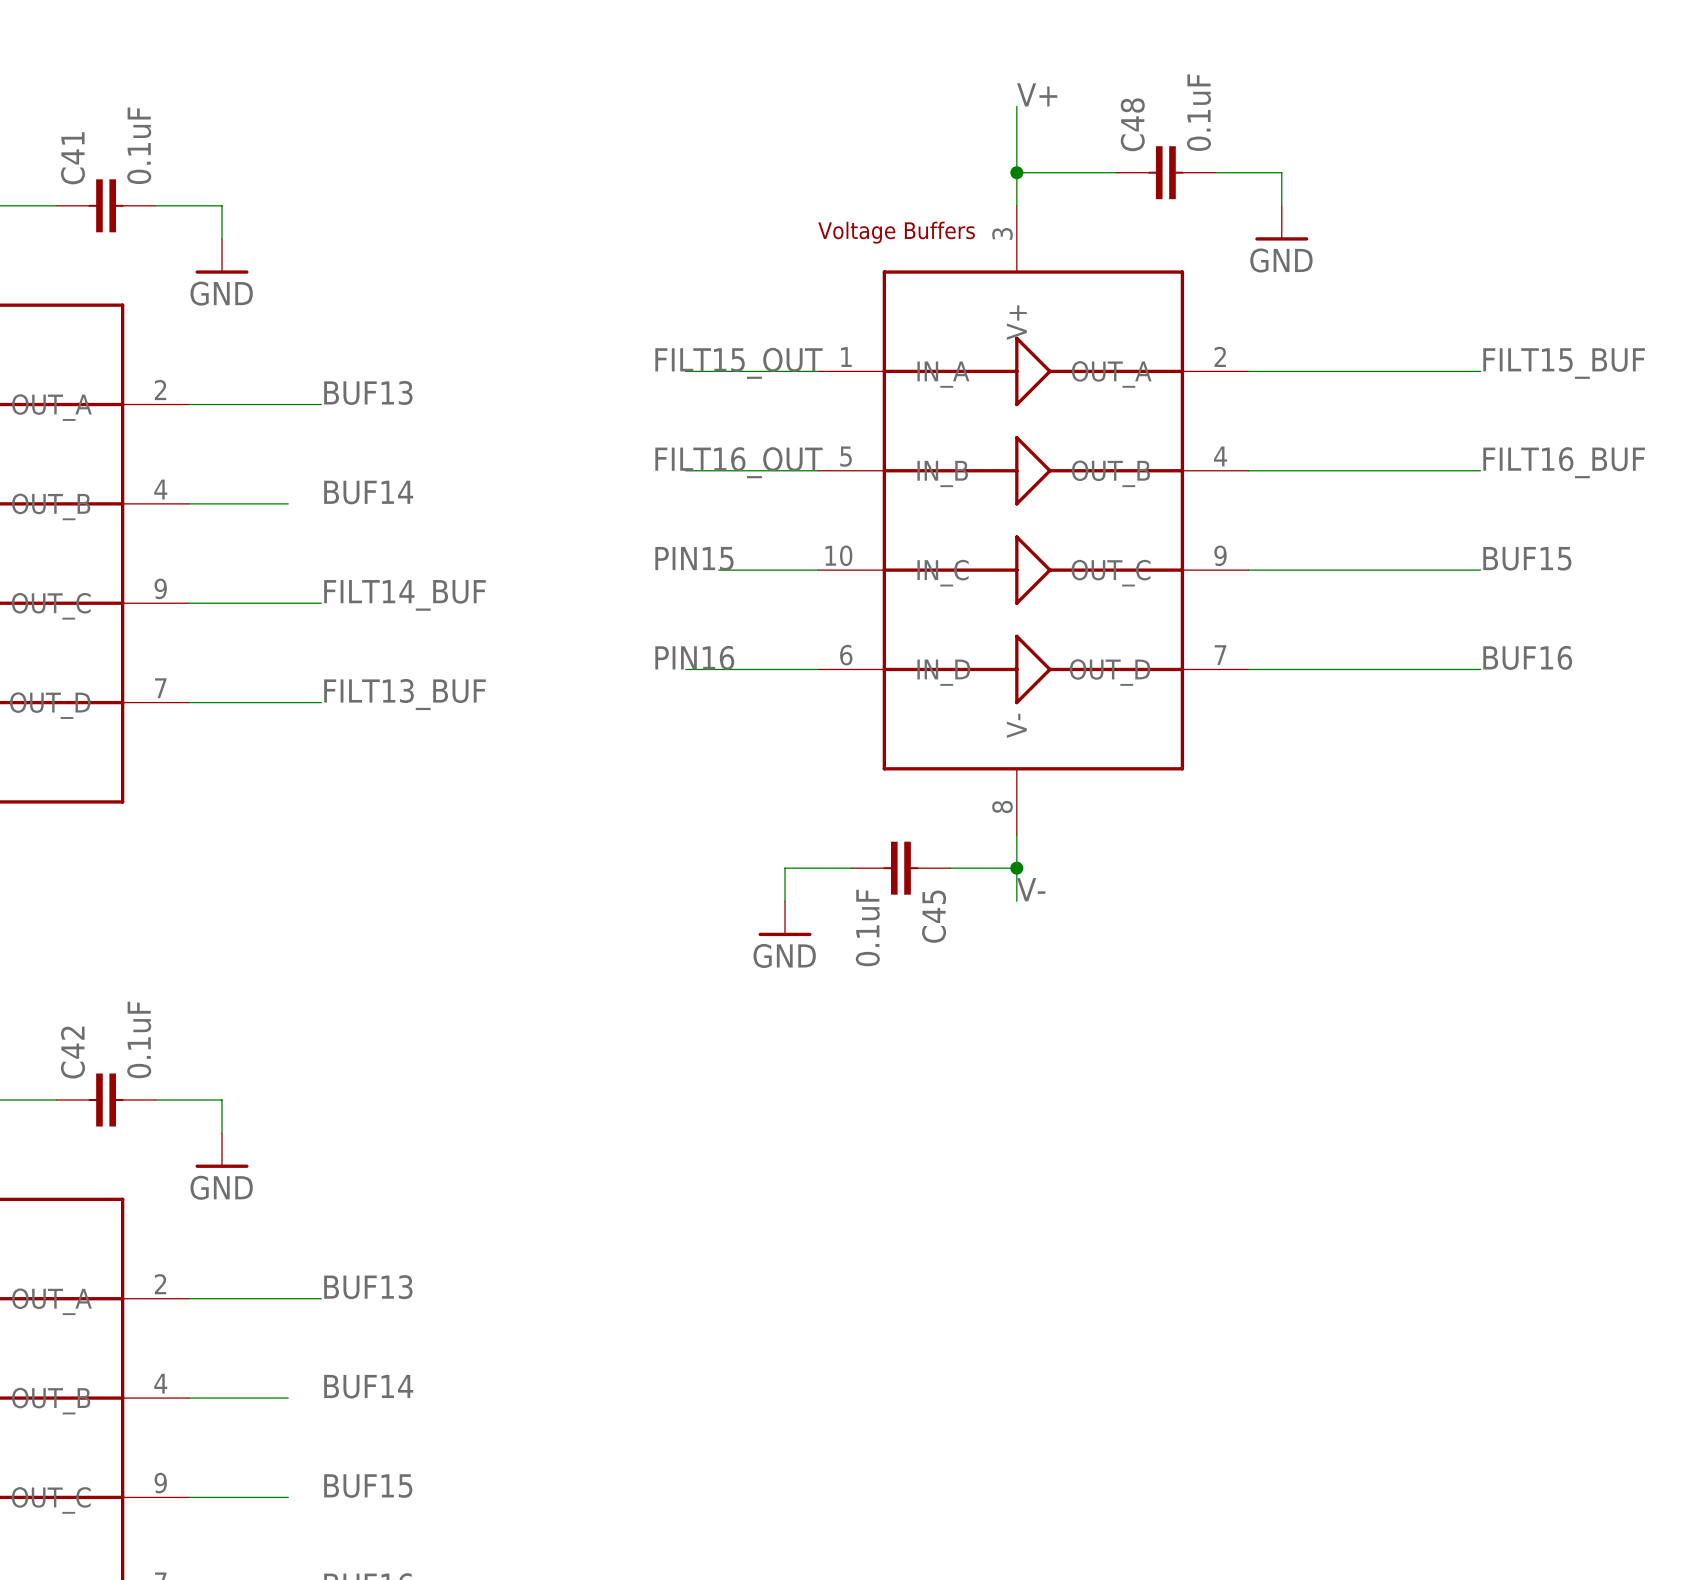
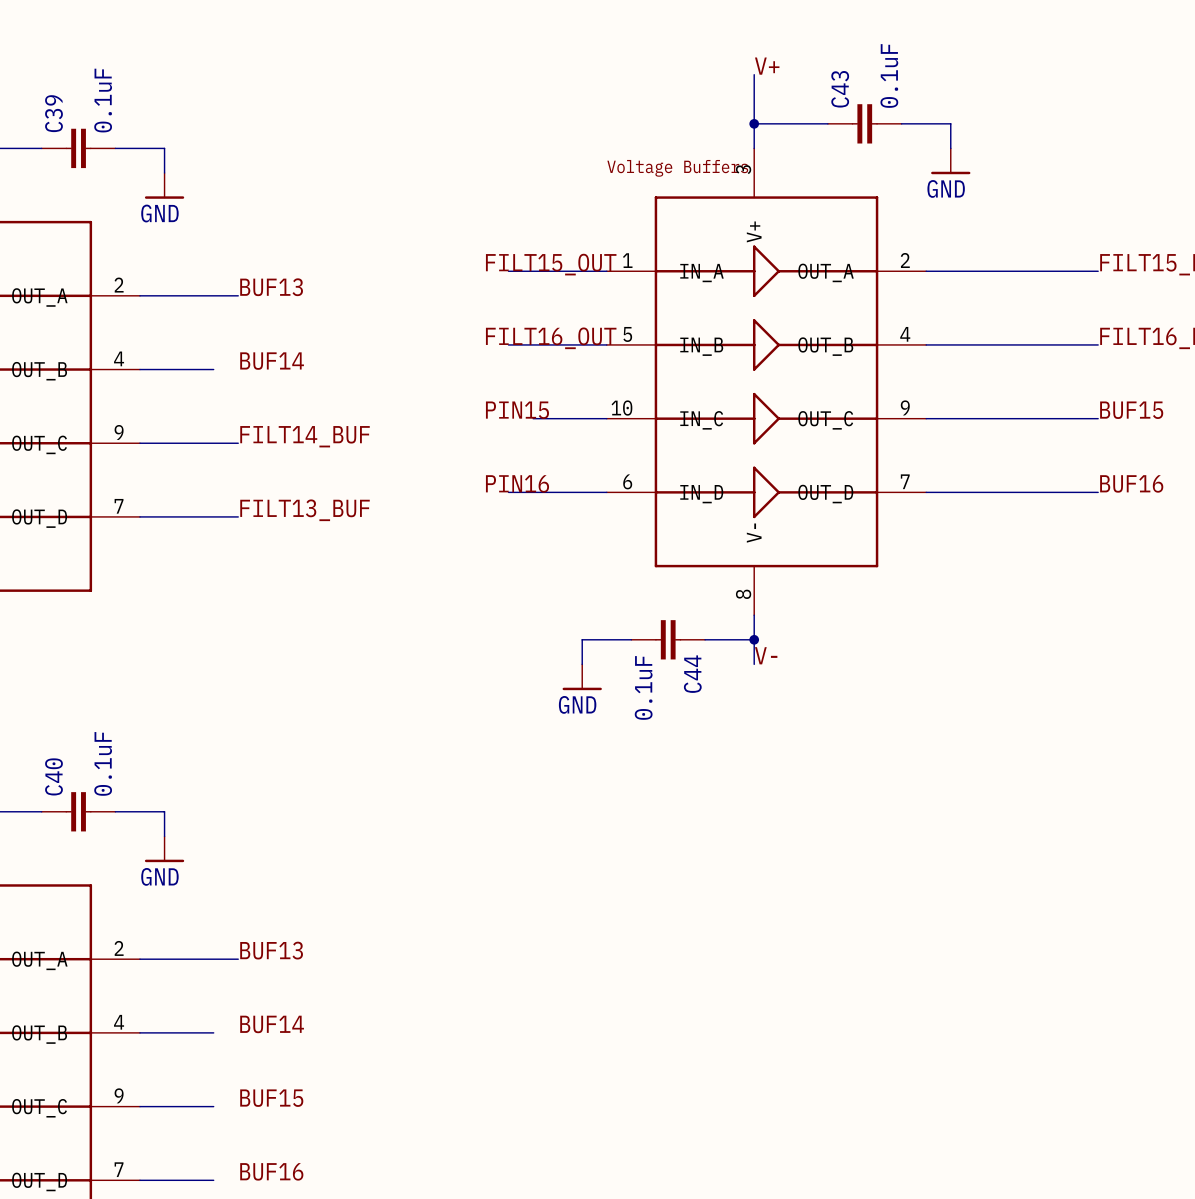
C48 name: C48 (1132, 124) -> C43 (840, 89)
C41 name: C41 (72, 158) -> C39 (53, 113)
C45 name: C45 (934, 916) -> C44 (692, 674)
C42 name: C42 (72, 1052) -> C40 (53, 776)

